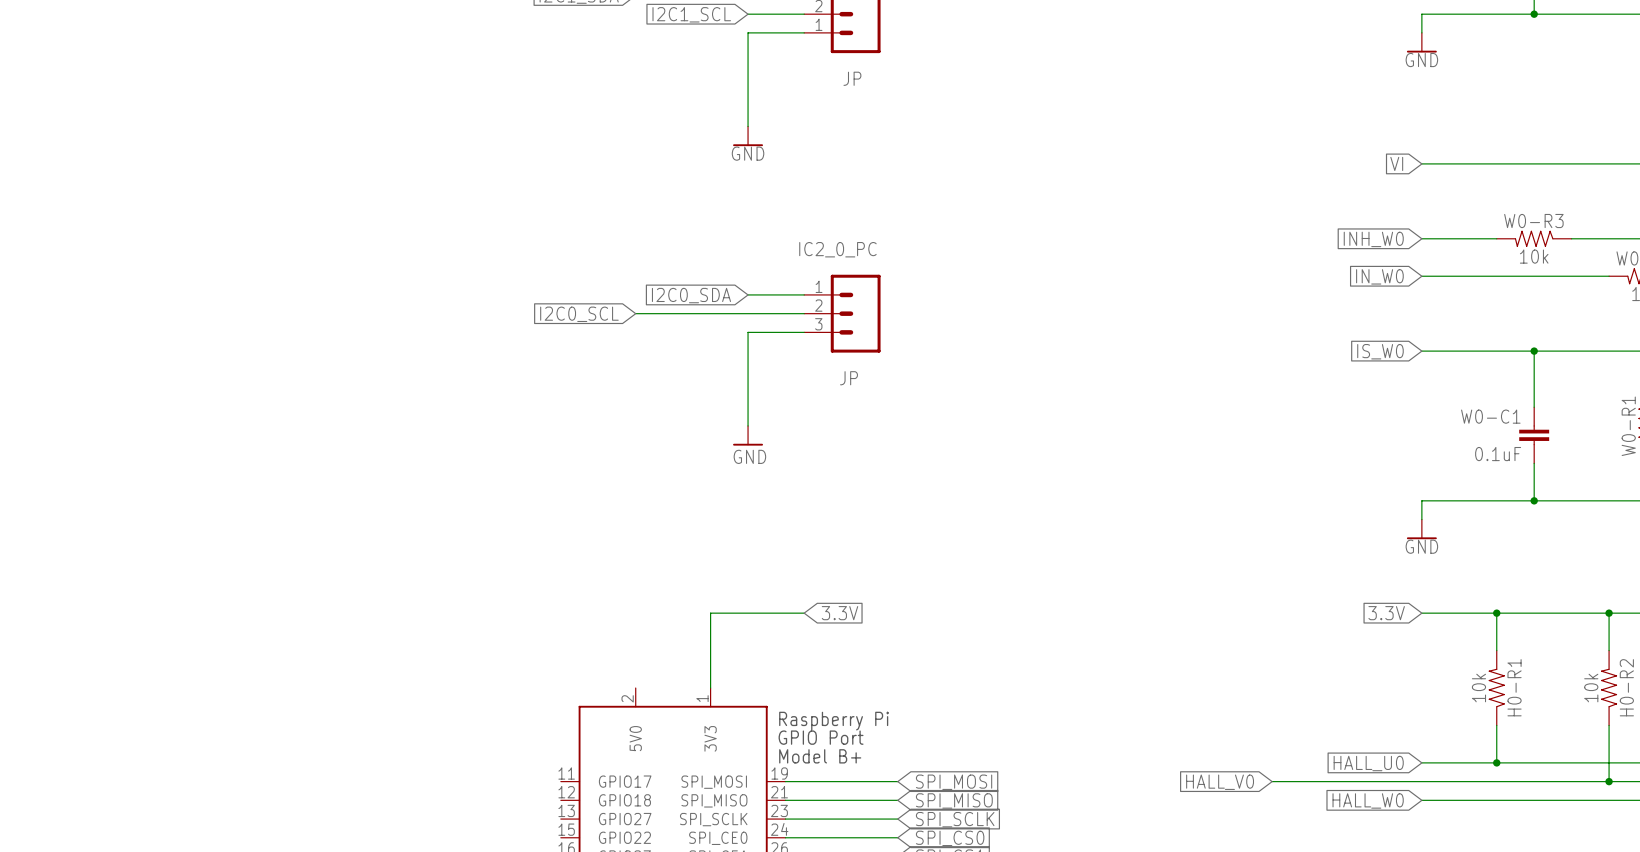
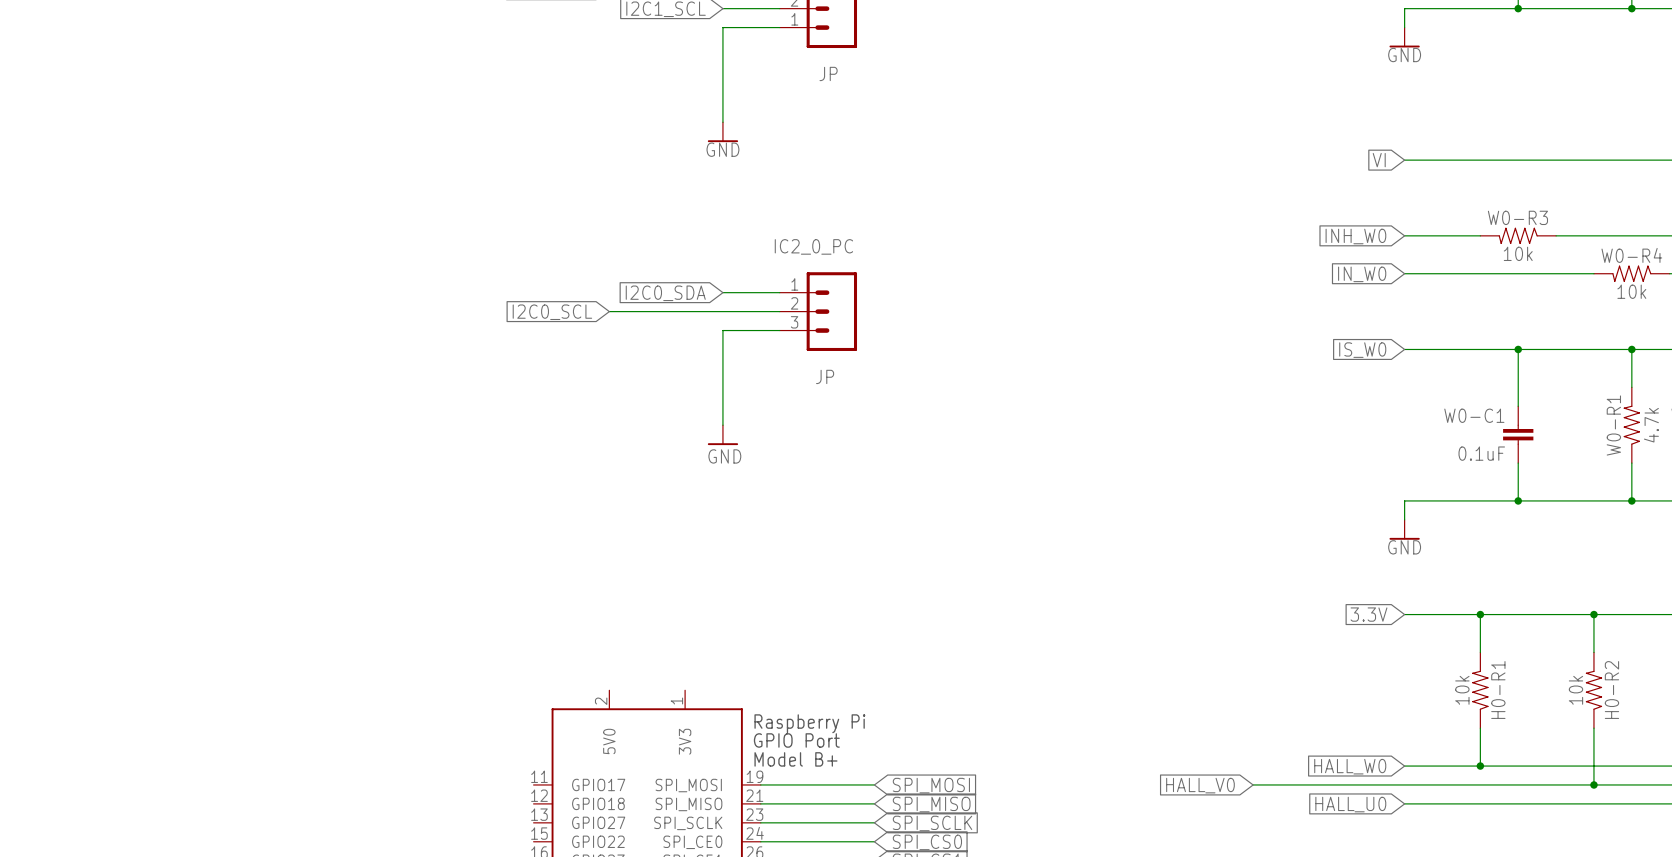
wire: (804, 613) (710, 613) (710, 688) -> none
global label: 3.3V (839, 613) -> none
global label: HALL_U0 (1368, 763) -> HALL_W0 (1350, 766)
global label: HALL_W0 (1368, 800) -> HALL_U0 (1350, 804)

